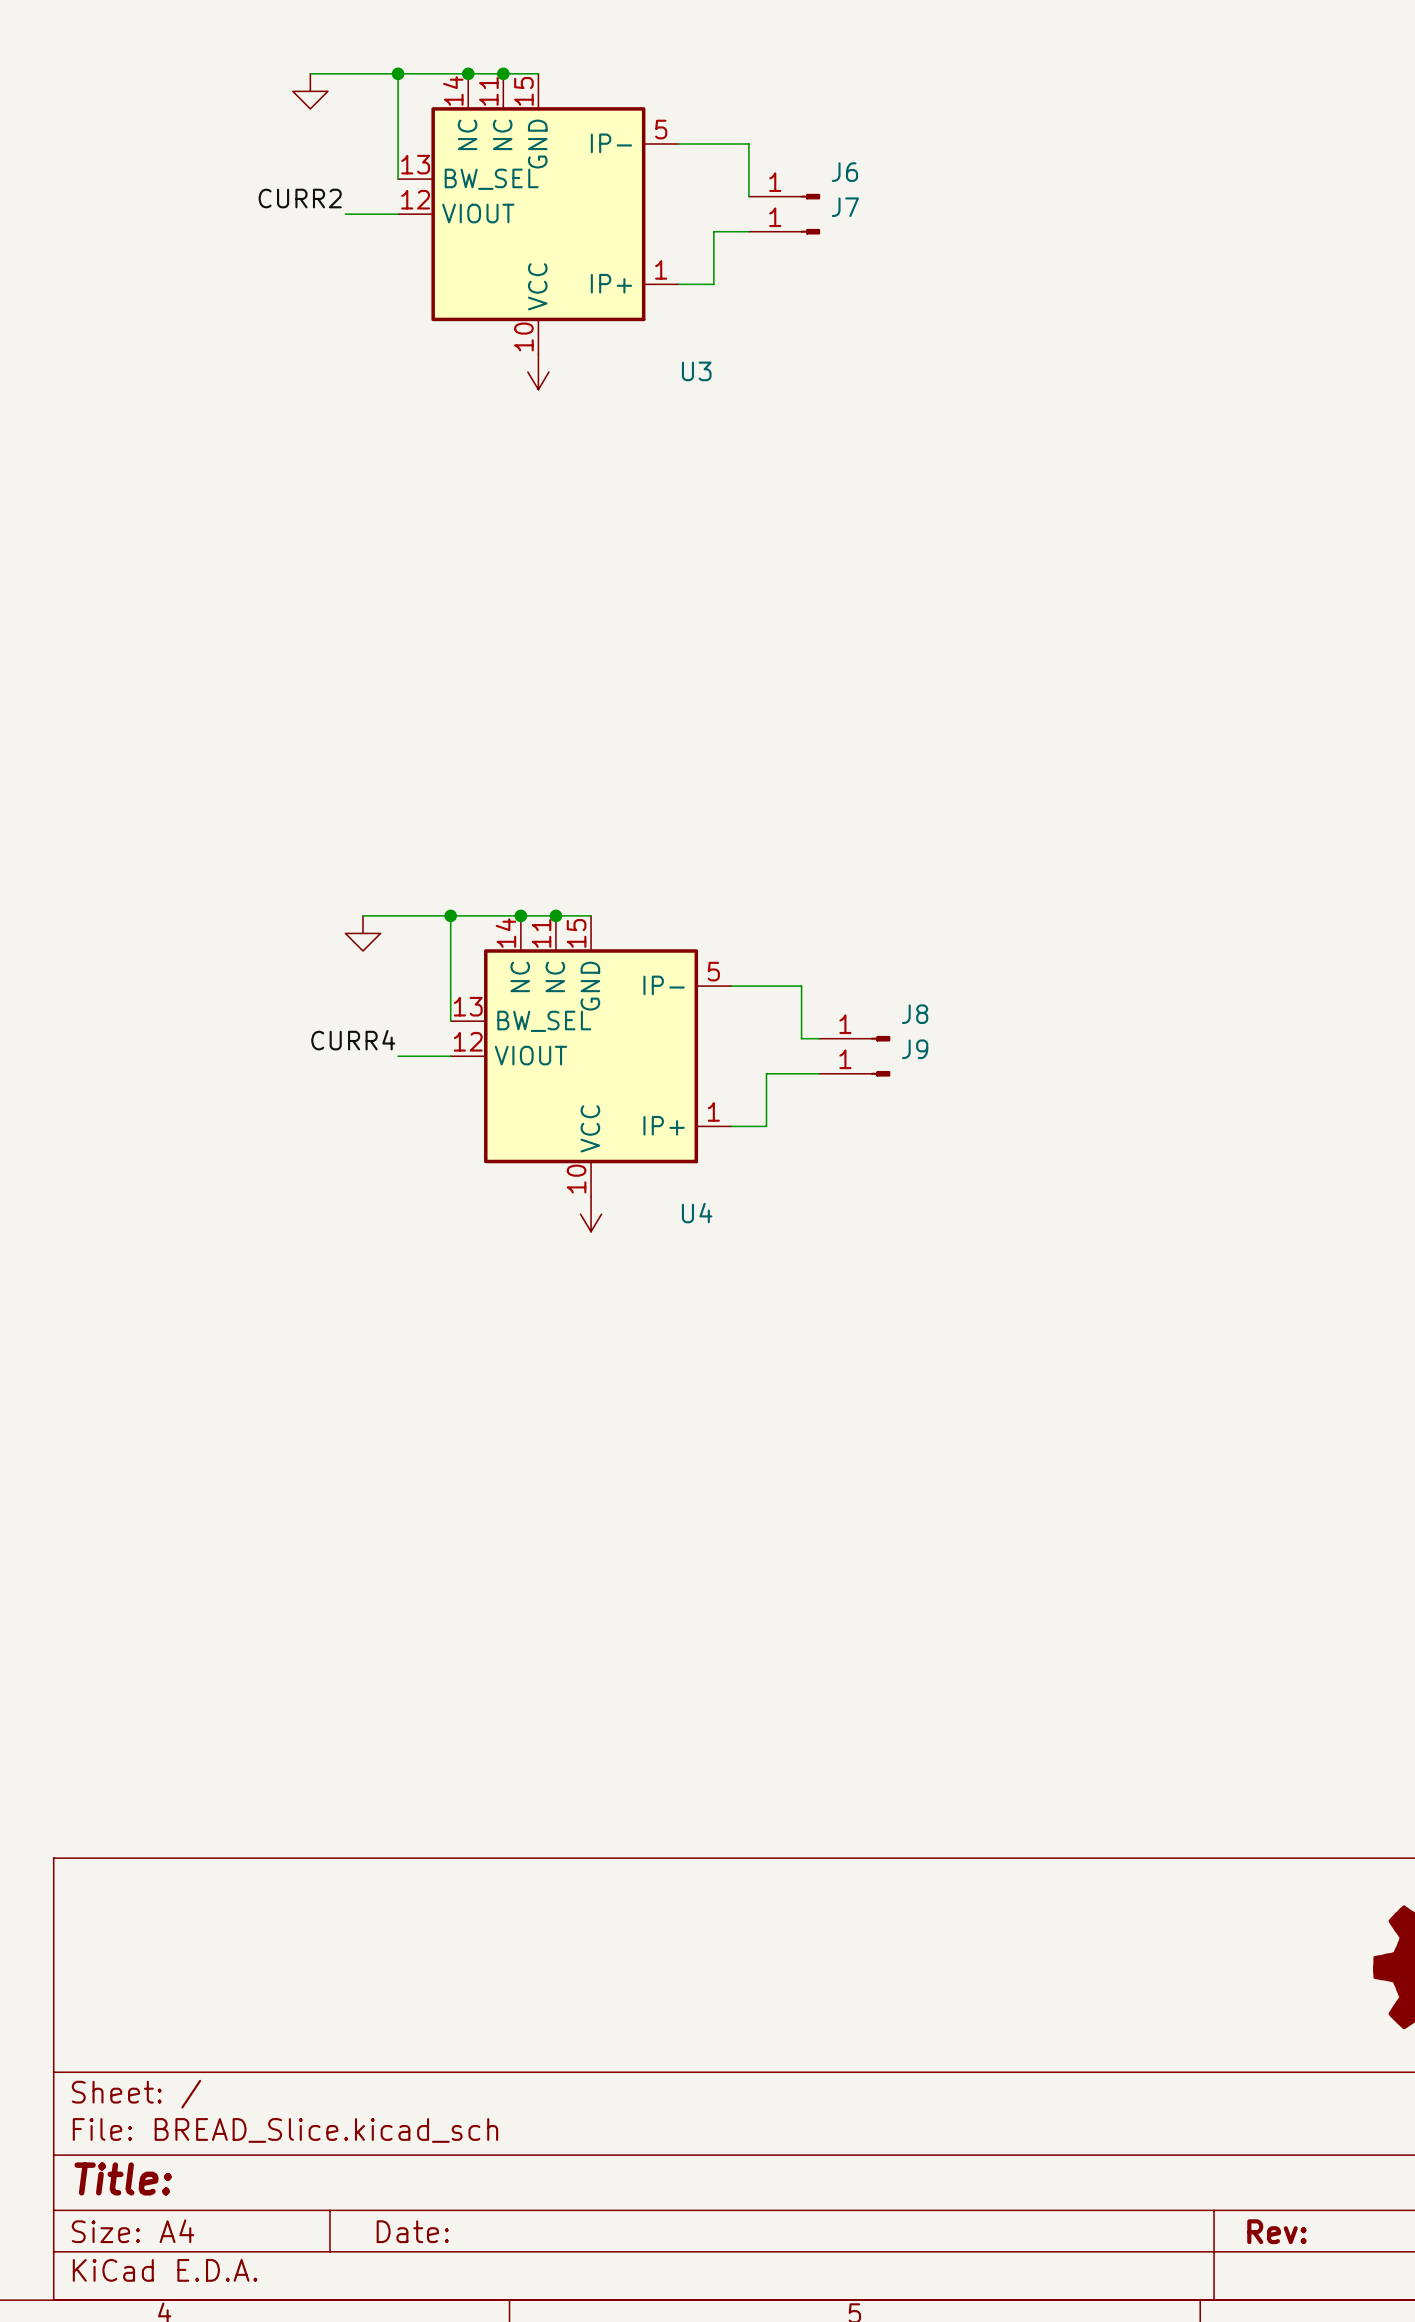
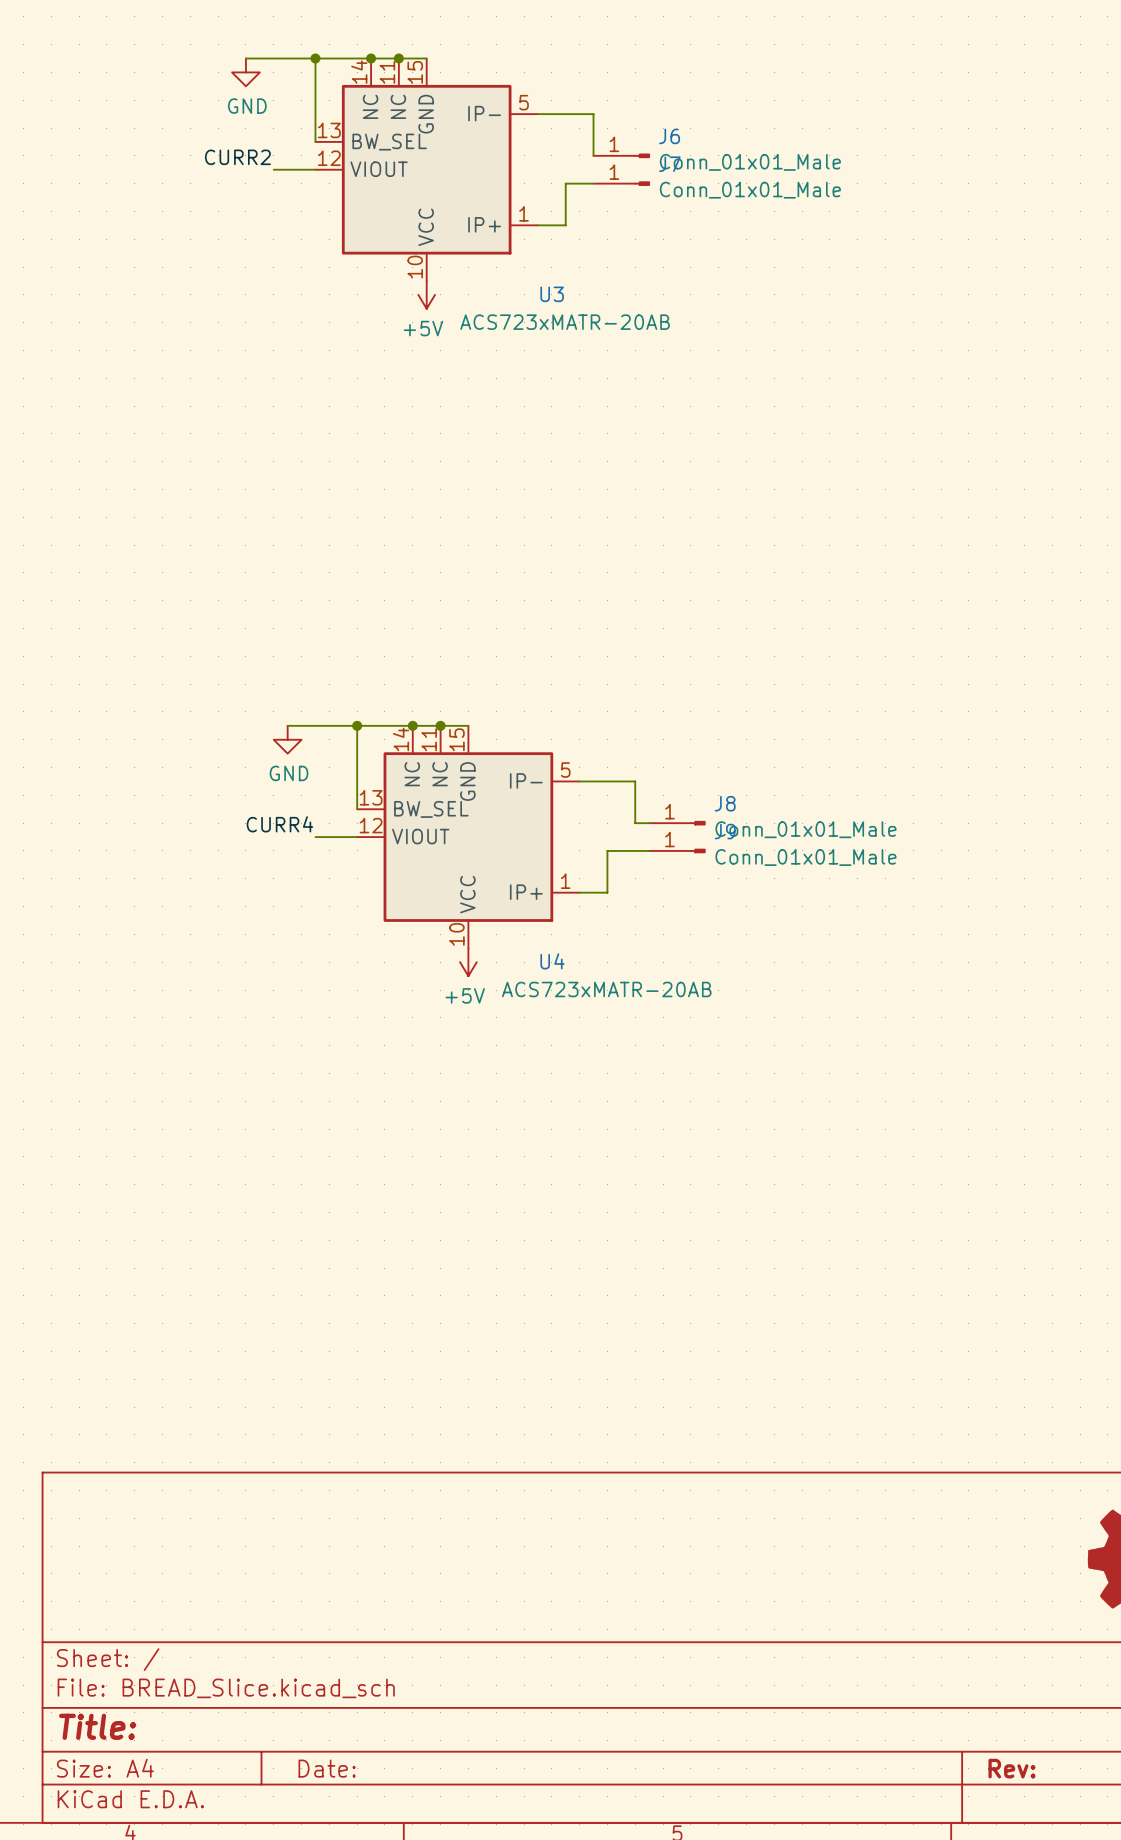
power symbol text: none -> GND (247, 106)
J6 value: none -> Conn_01x01_Male (750, 162)
J7 value: none -> Conn_01x01_Male (750, 190)
U3 value: none -> ACS723xMATR-20AB (565, 322)
power symbol text: none -> +5V (423, 328)
power symbol text: none -> GND (289, 773)
J8 value: none -> Conn_01x01_Male (805, 829)
J9 value: none -> Conn_01x01_Male (805, 857)
U4 value: none -> ACS723xMATR-20AB (606, 989)
power symbol text: none -> +5V (465, 995)

